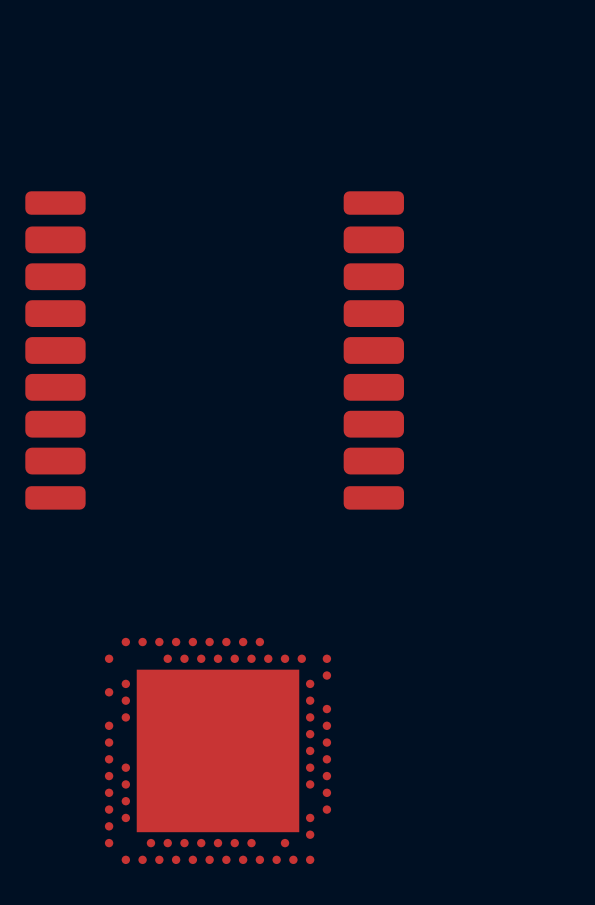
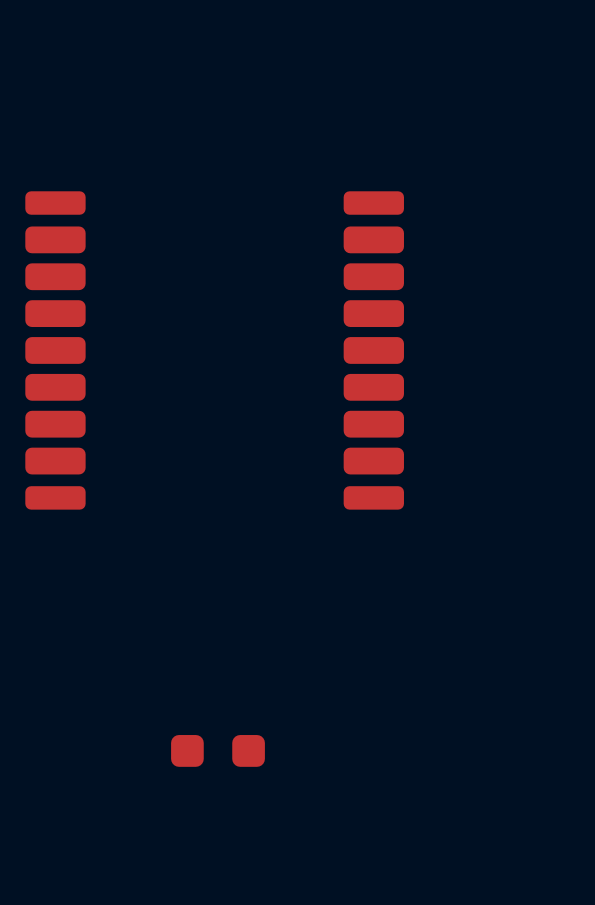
part footprint: [104, 637, 332, 865] -> [171, 735, 265, 767]

